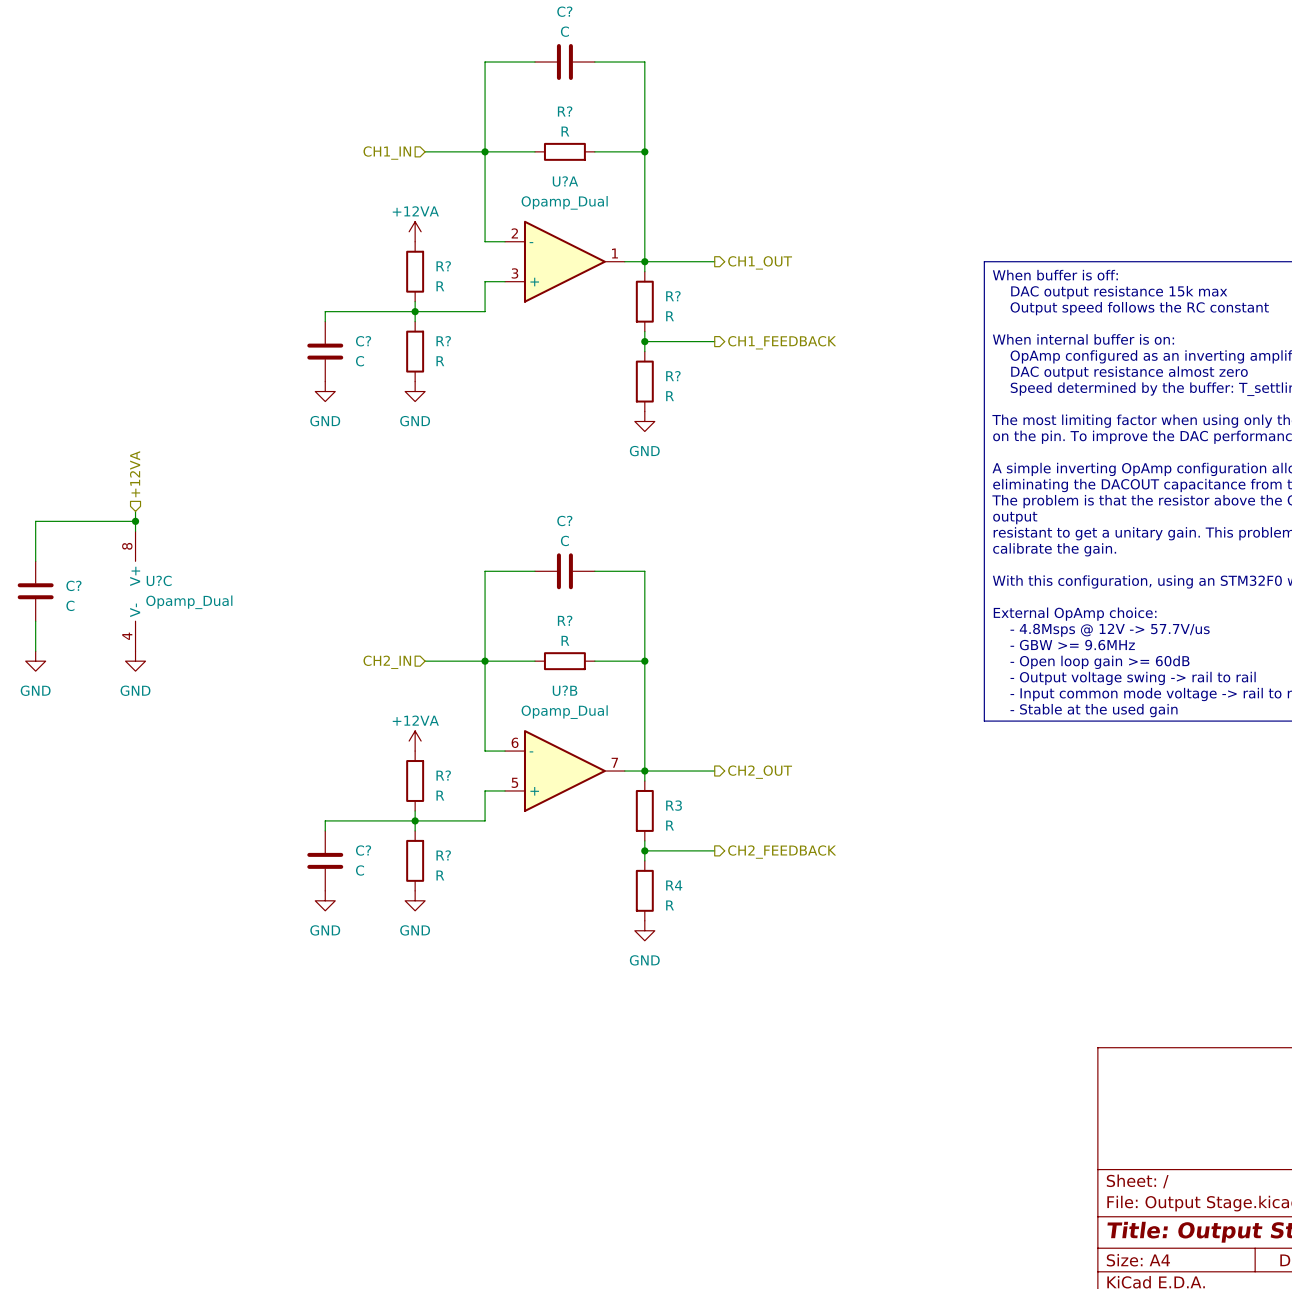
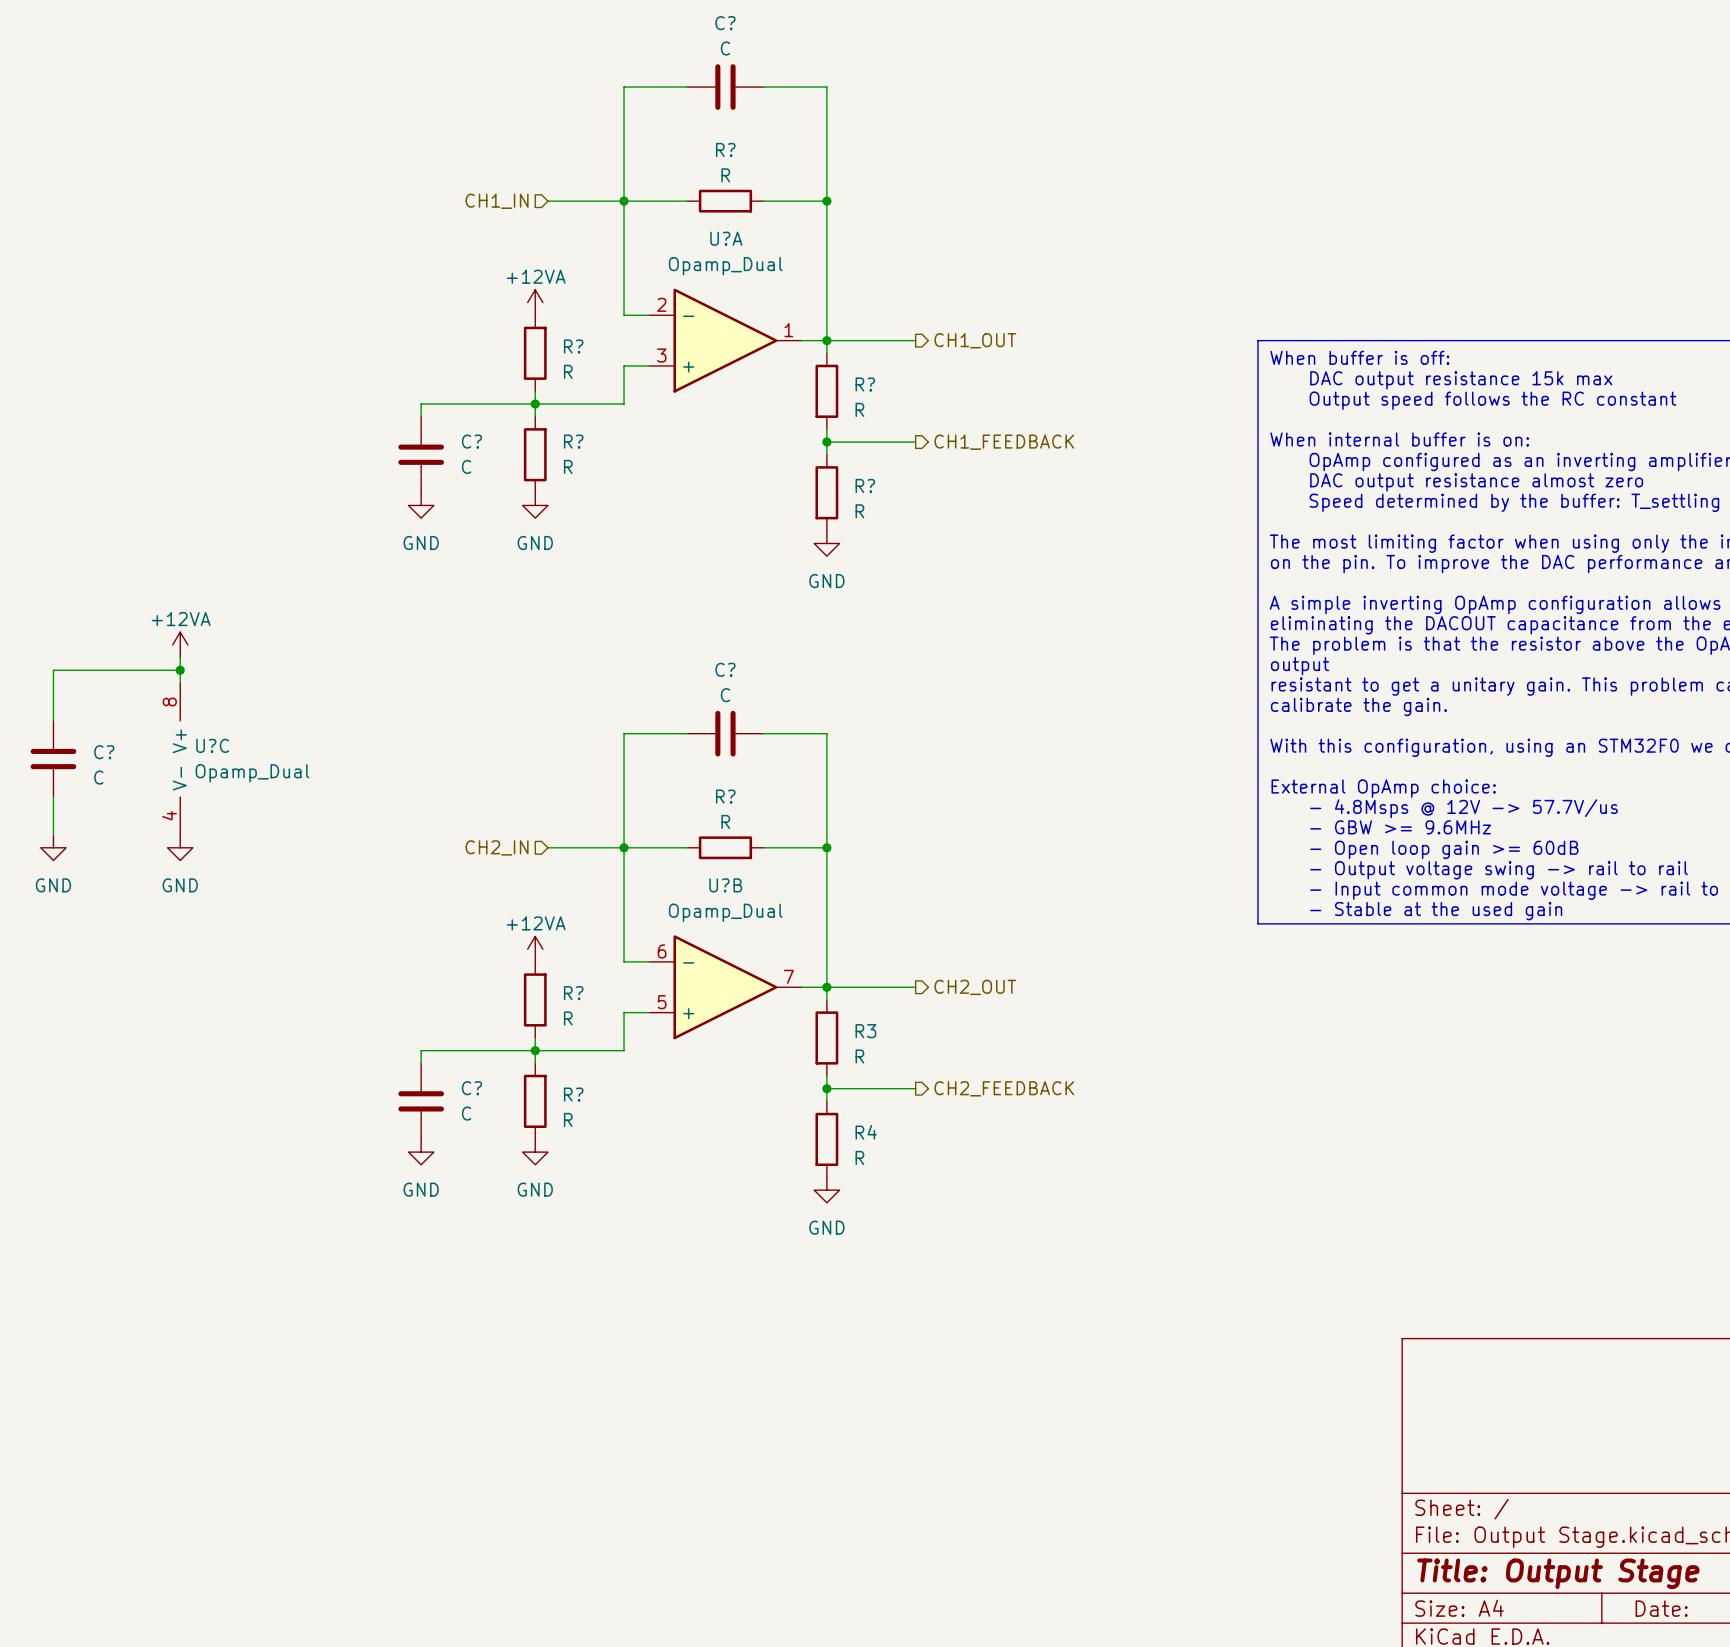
hierarchical label: +12VA (135, 474) -> none
power symbol: none -> +12VA (180, 644)

